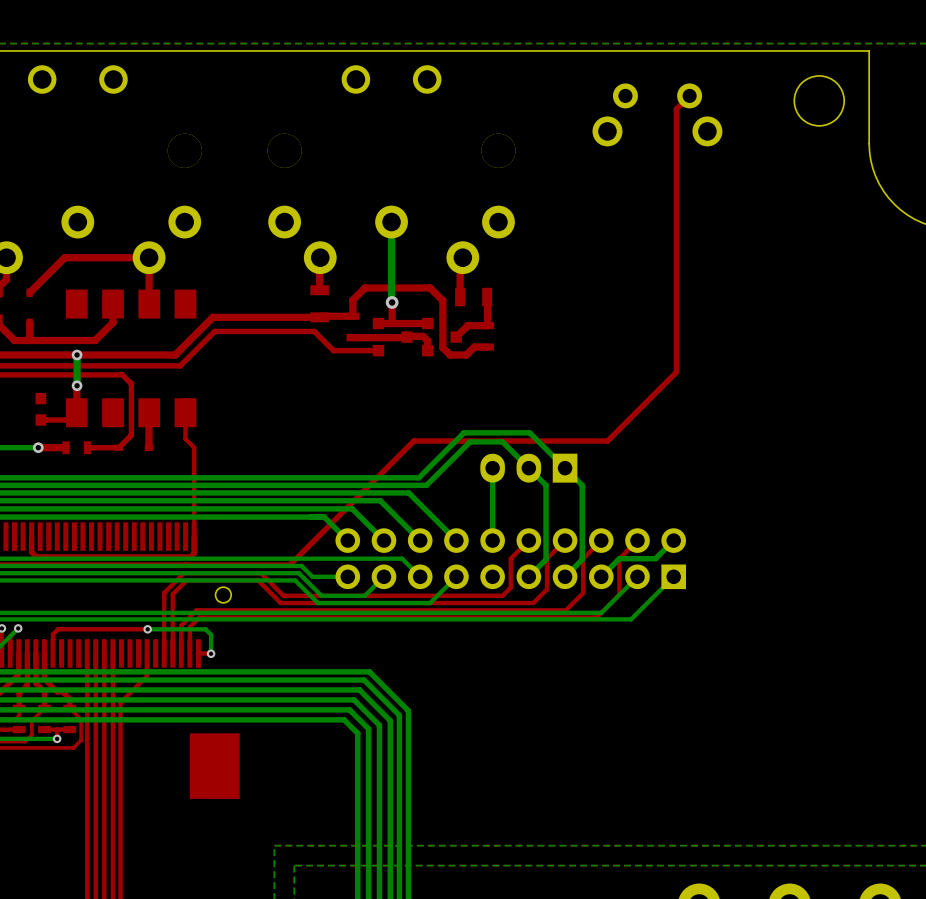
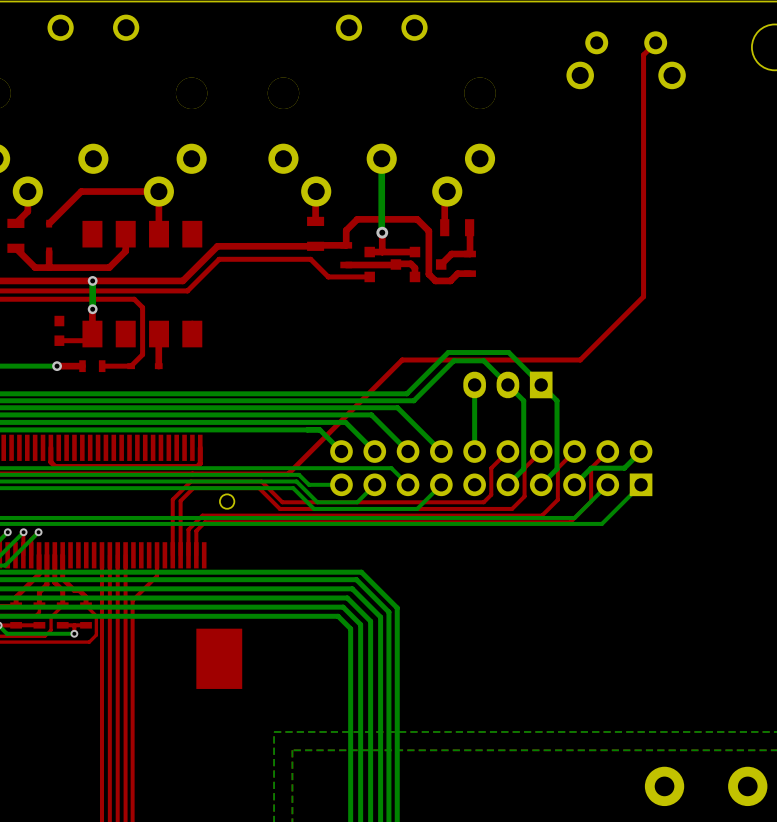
top track: (185, 412) (185, 438) (194, 447) (194, 536) -> none
top track: (147, 629) (58, 629) (52, 634) (52, 653) -> none
bottom track: (147, 629) (205, 629) (211, 634) (211, 653) -> none
via: (147, 629) -> none
top track: (198, 653) (211, 653) -> none
via: (211, 653) -> none

